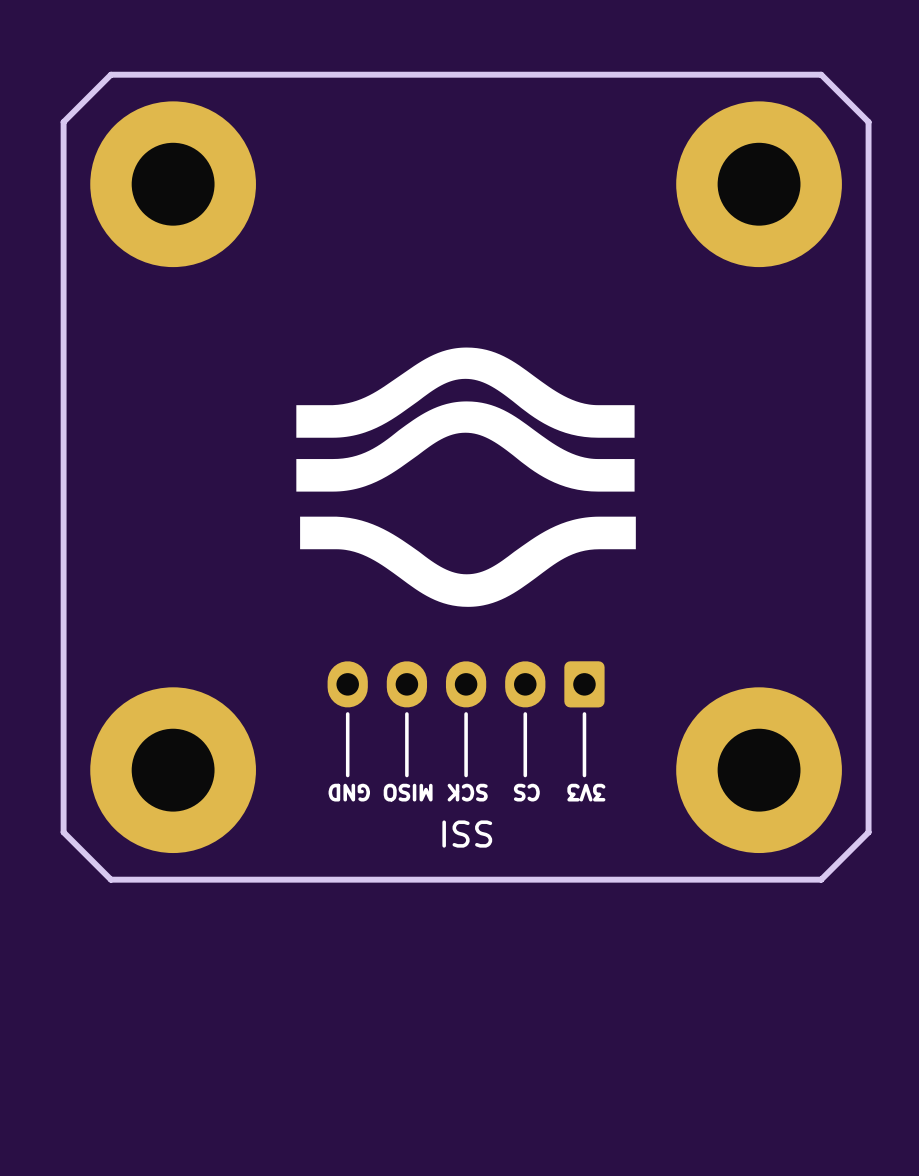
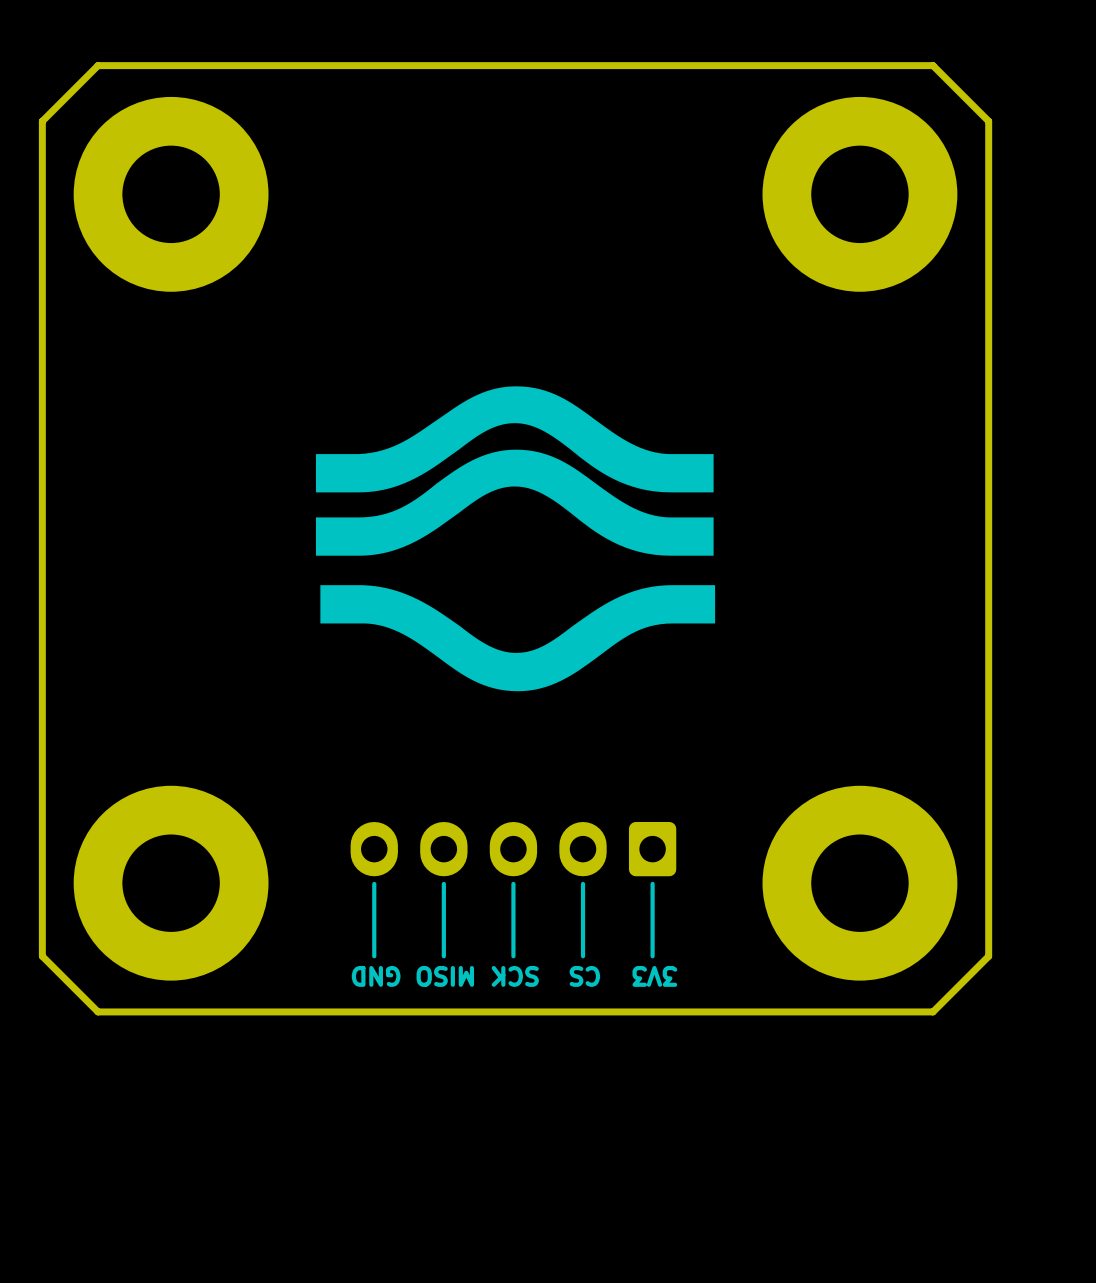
part position: (466, 684) -> (513, 849)
line: (347, 713) (347, 775) -> (374, 883) (374, 956)
line: (406, 713) (406, 775) -> (443, 883) (443, 956)
line: (466, 713) (466, 775) -> (513, 883) (513, 956)
line: (525, 713) (525, 775) -> (583, 883) (583, 956)
line: (584, 713) (584, 775) -> (652, 883) (652, 956)
text position: GND (349, 792) -> GND (376, 976)
text position: MISO (408, 792) -> MISO (445, 976)
text: SCK (467, 792) -> none
text position: CS (526, 792) -> CS (584, 976)
text position: 3V3 (586, 792) -> 3V3 (654, 976)
text: SSI (467, 834) -> SCK (515, 976)

